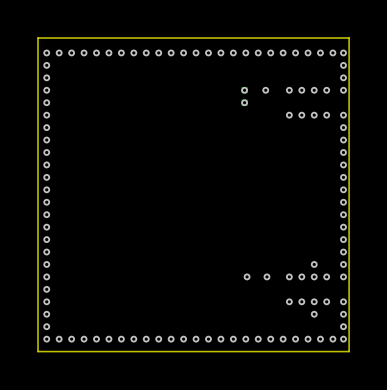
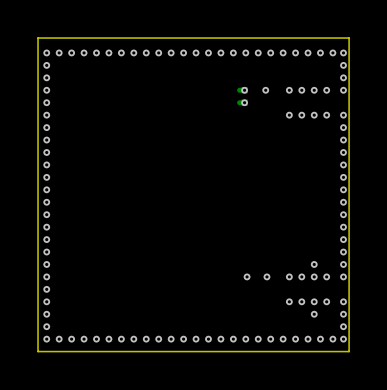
track: none -> (244, 90) (239, 90)
track: none -> (244, 102) (239, 102)

